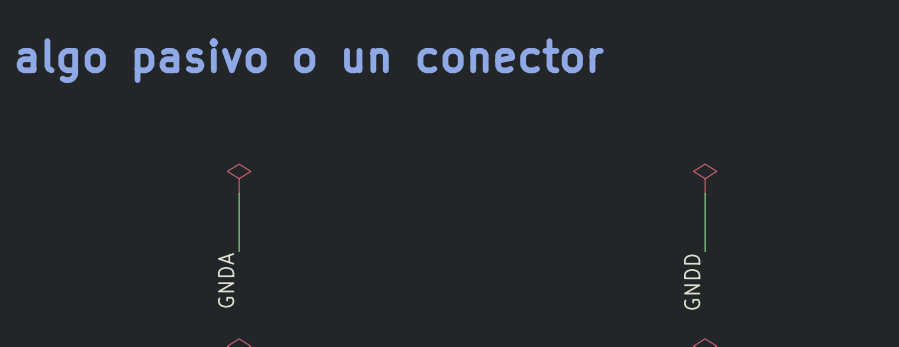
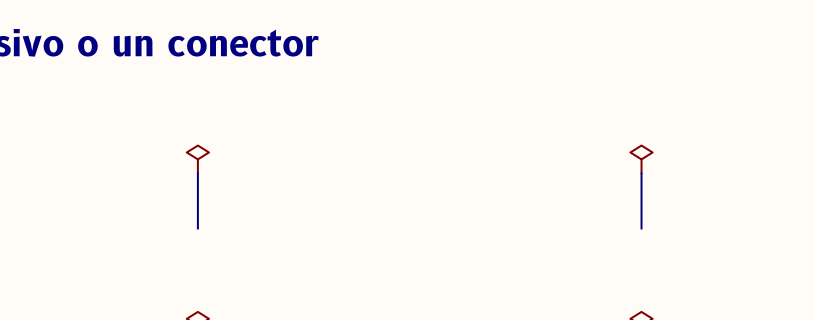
label: GNDA (226, 280) -> none
label: GNDD (692, 282) -> none

